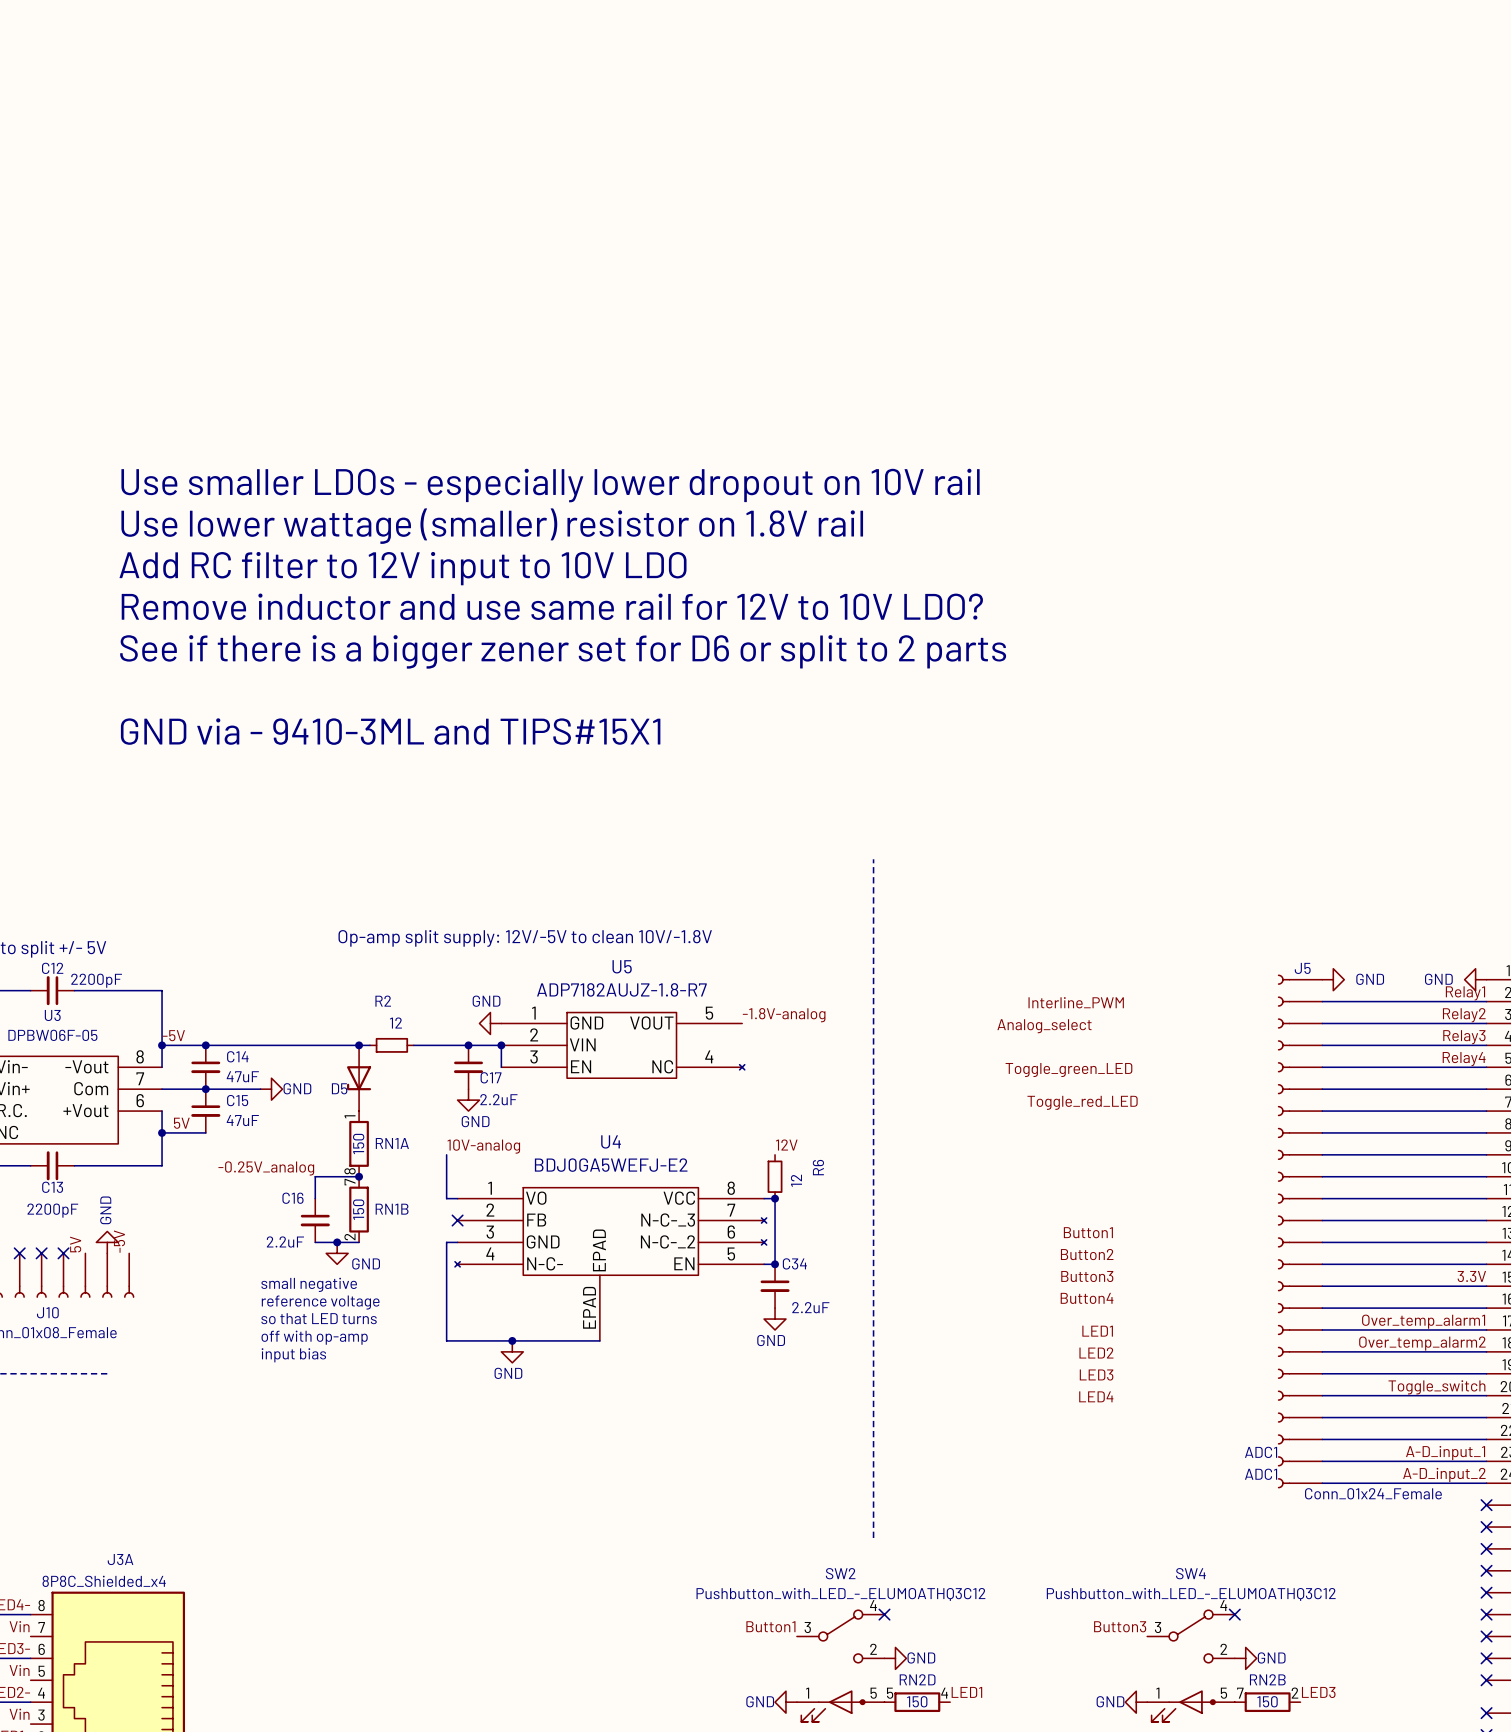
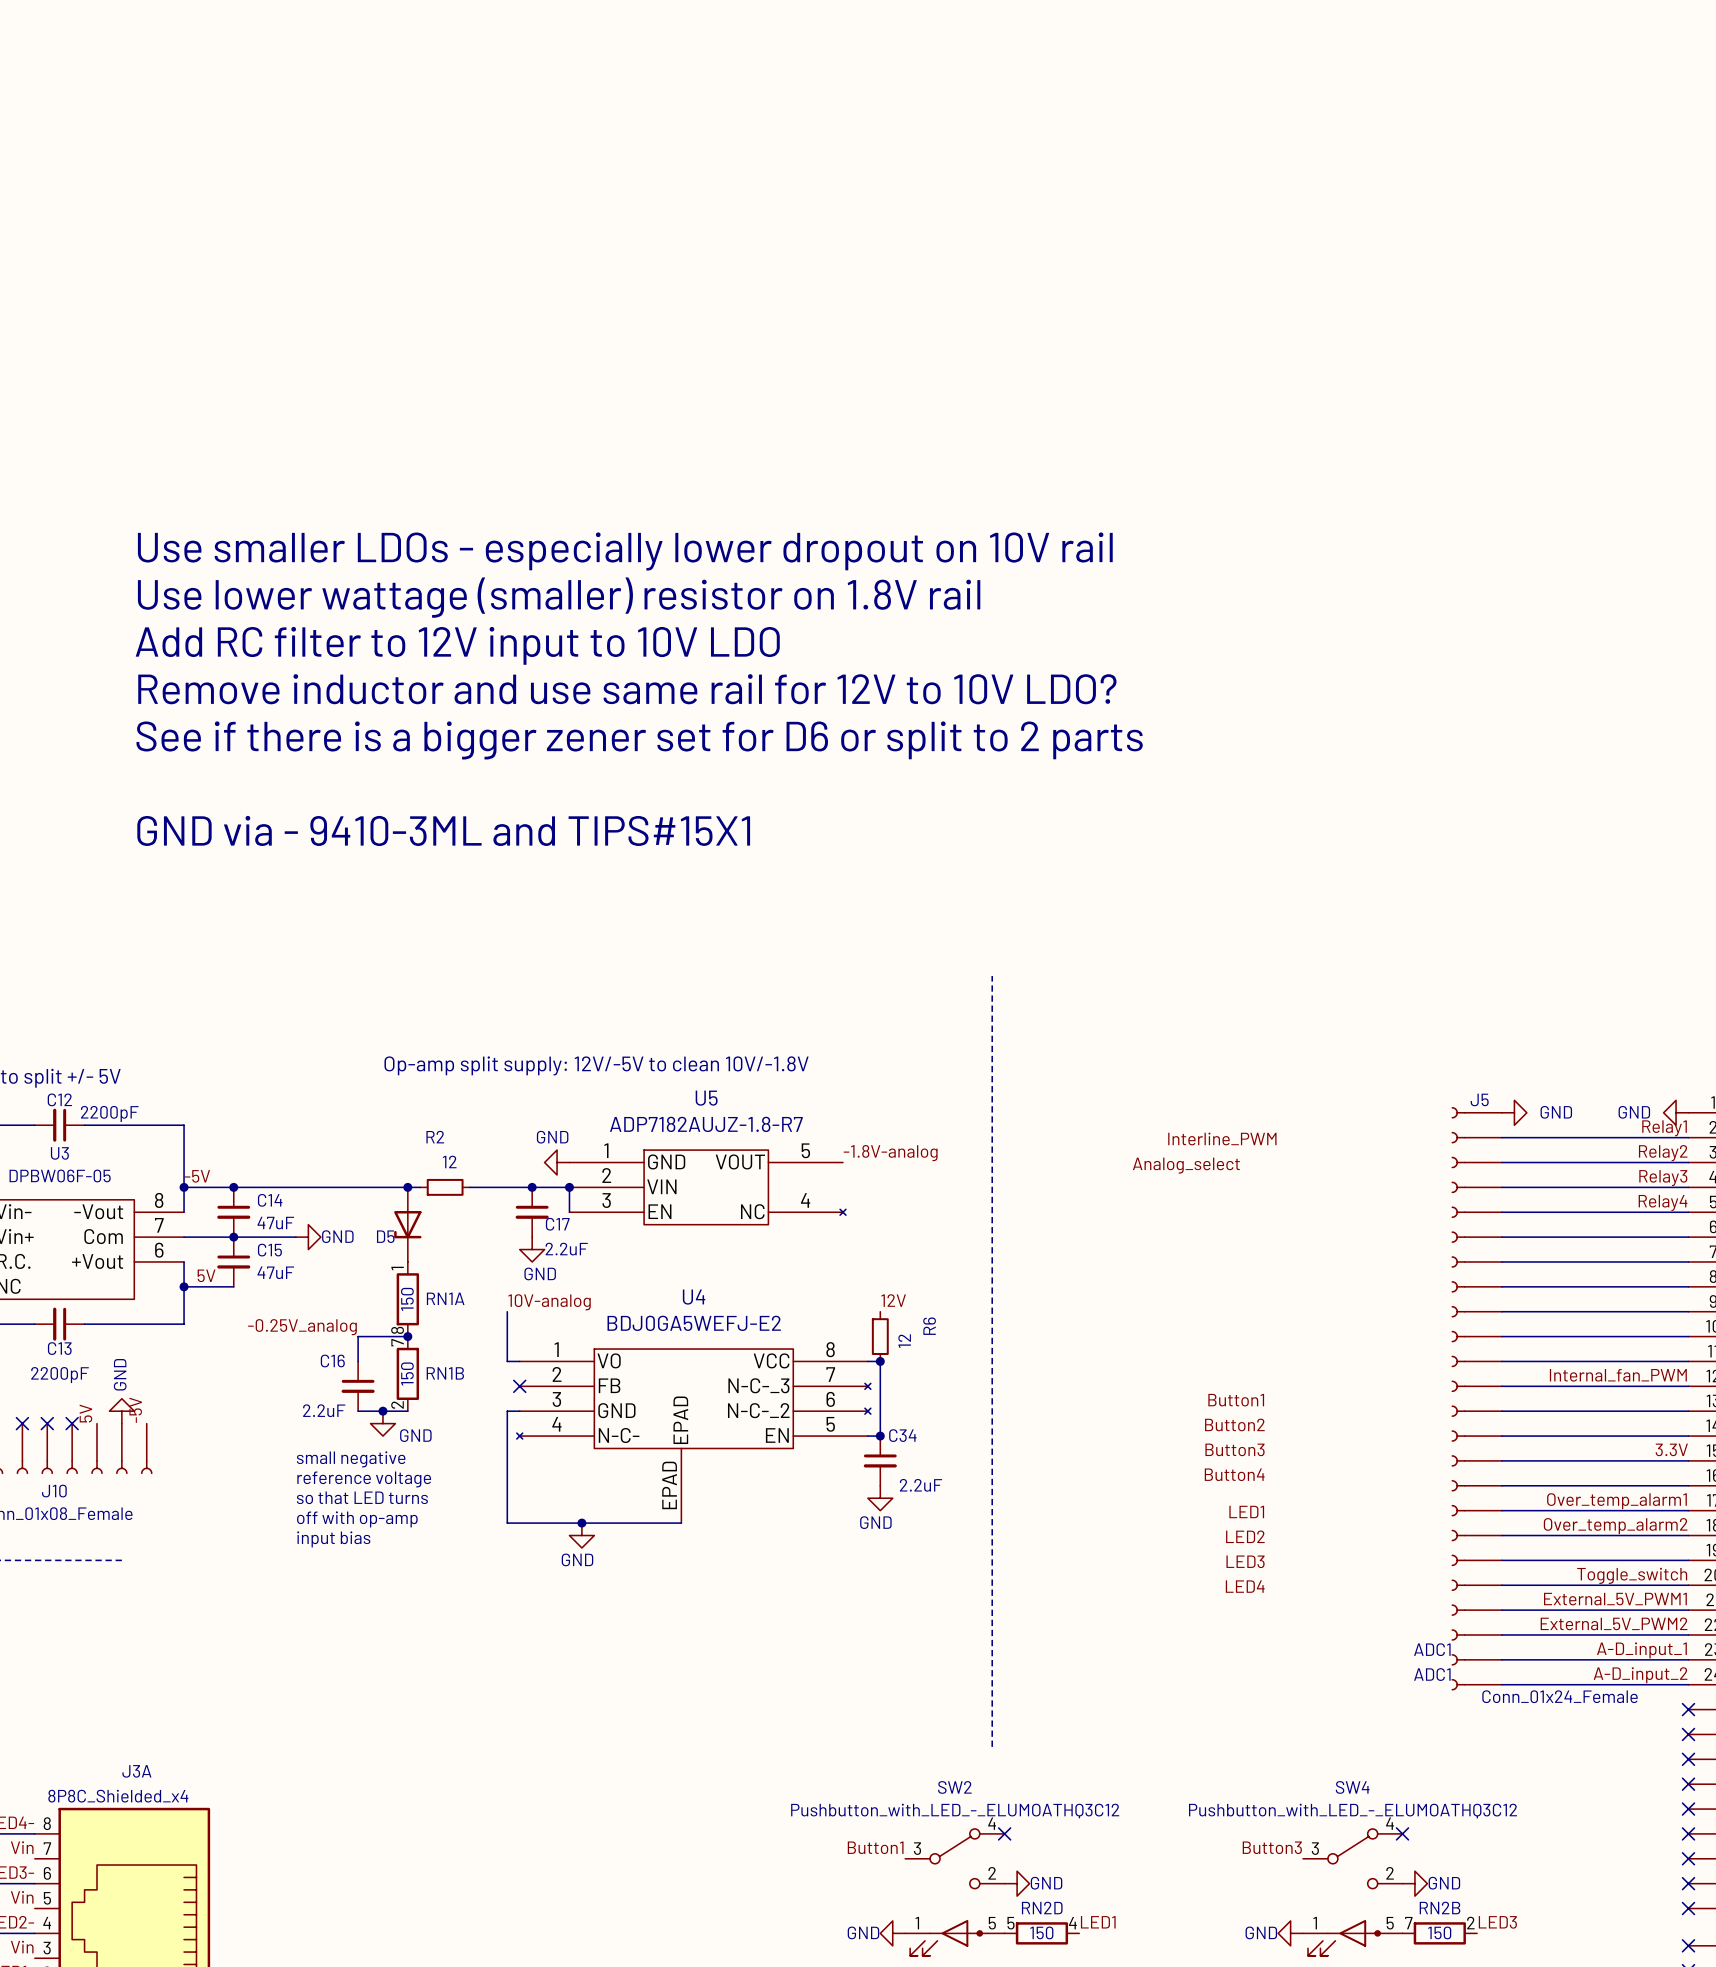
label: Toggle_green_LED (1068, 1070) -> none
label: Toggle_red_LED (1082, 1102) -> none
label: none -> Internal_fan_PWM (1618, 1375)
label: none -> External_5V_PWM1 (1615, 1599)
label: none -> External_5V_PWM2 (1614, 1623)

